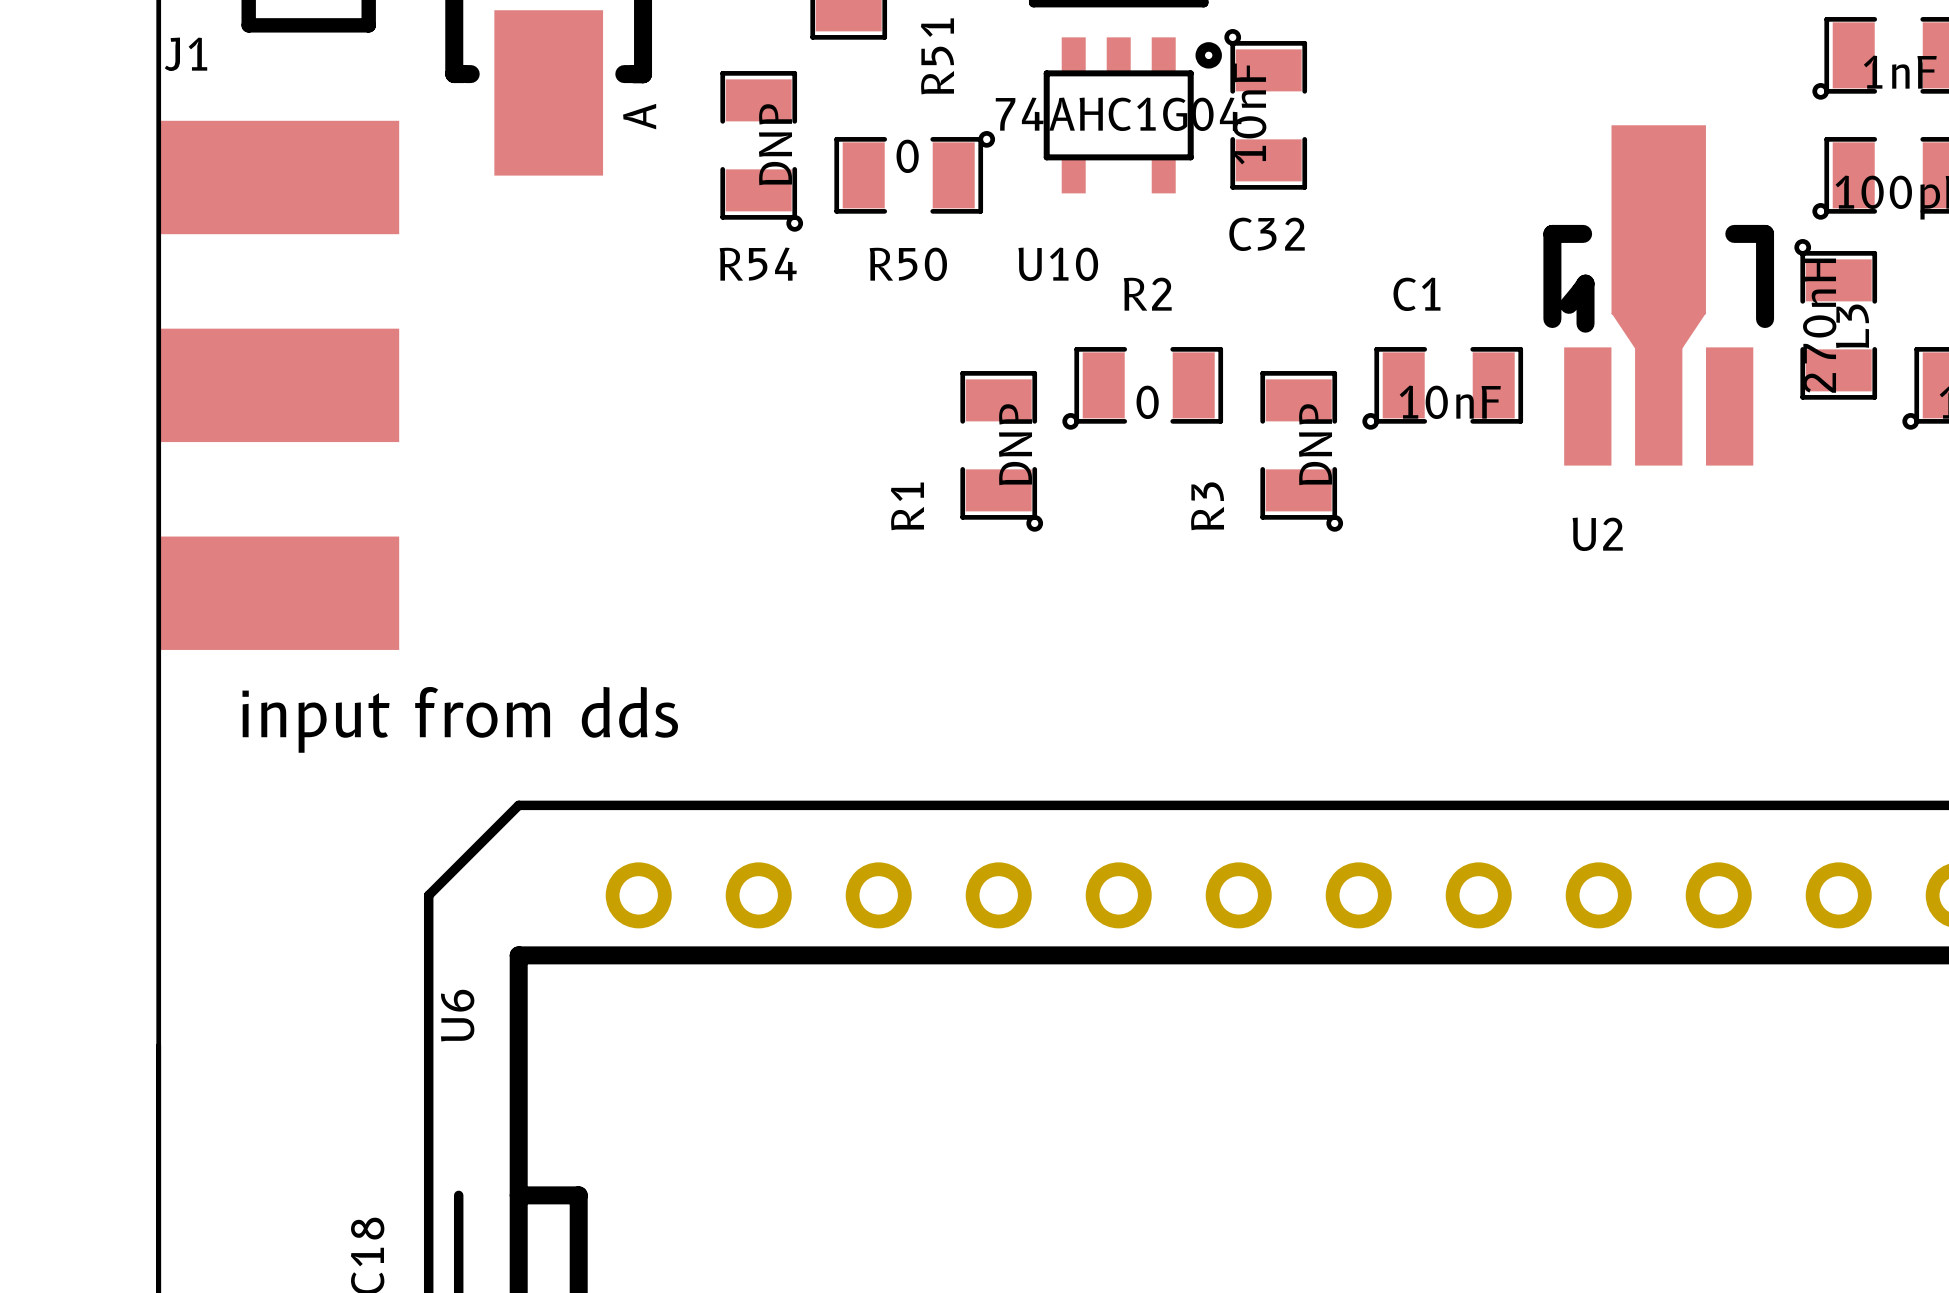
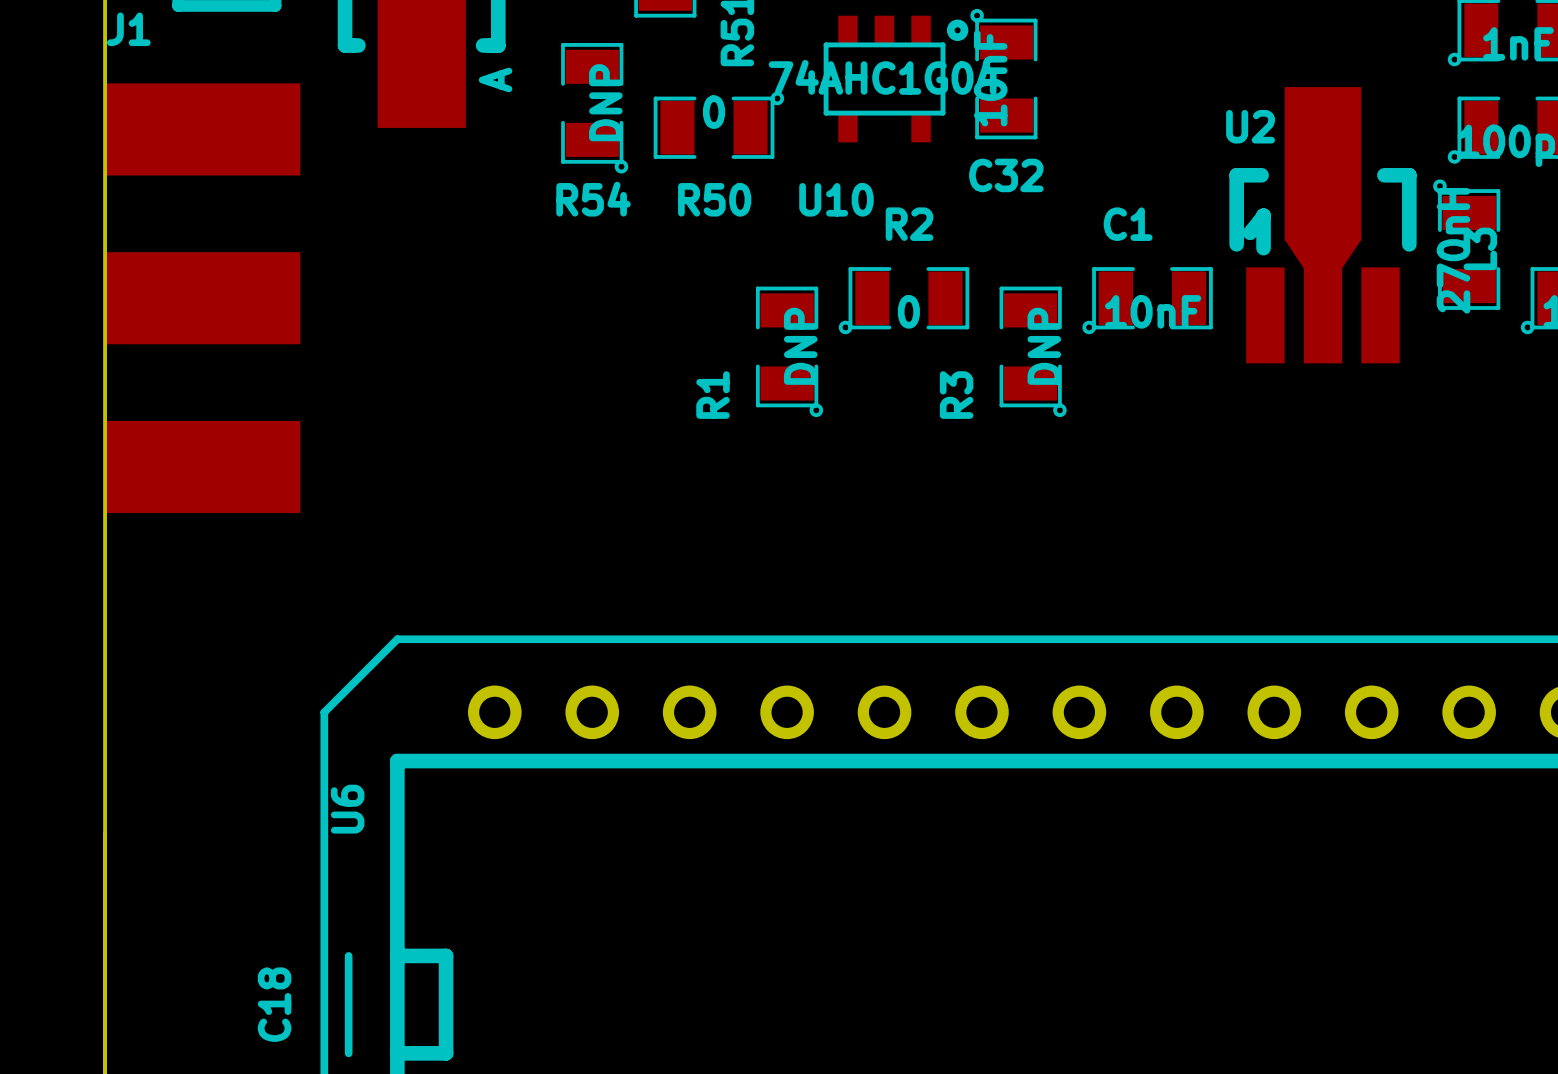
U2 name position: U2 (1597, 534) -> U2 (1250, 126)
text: input from dds (460, 719) -> none

